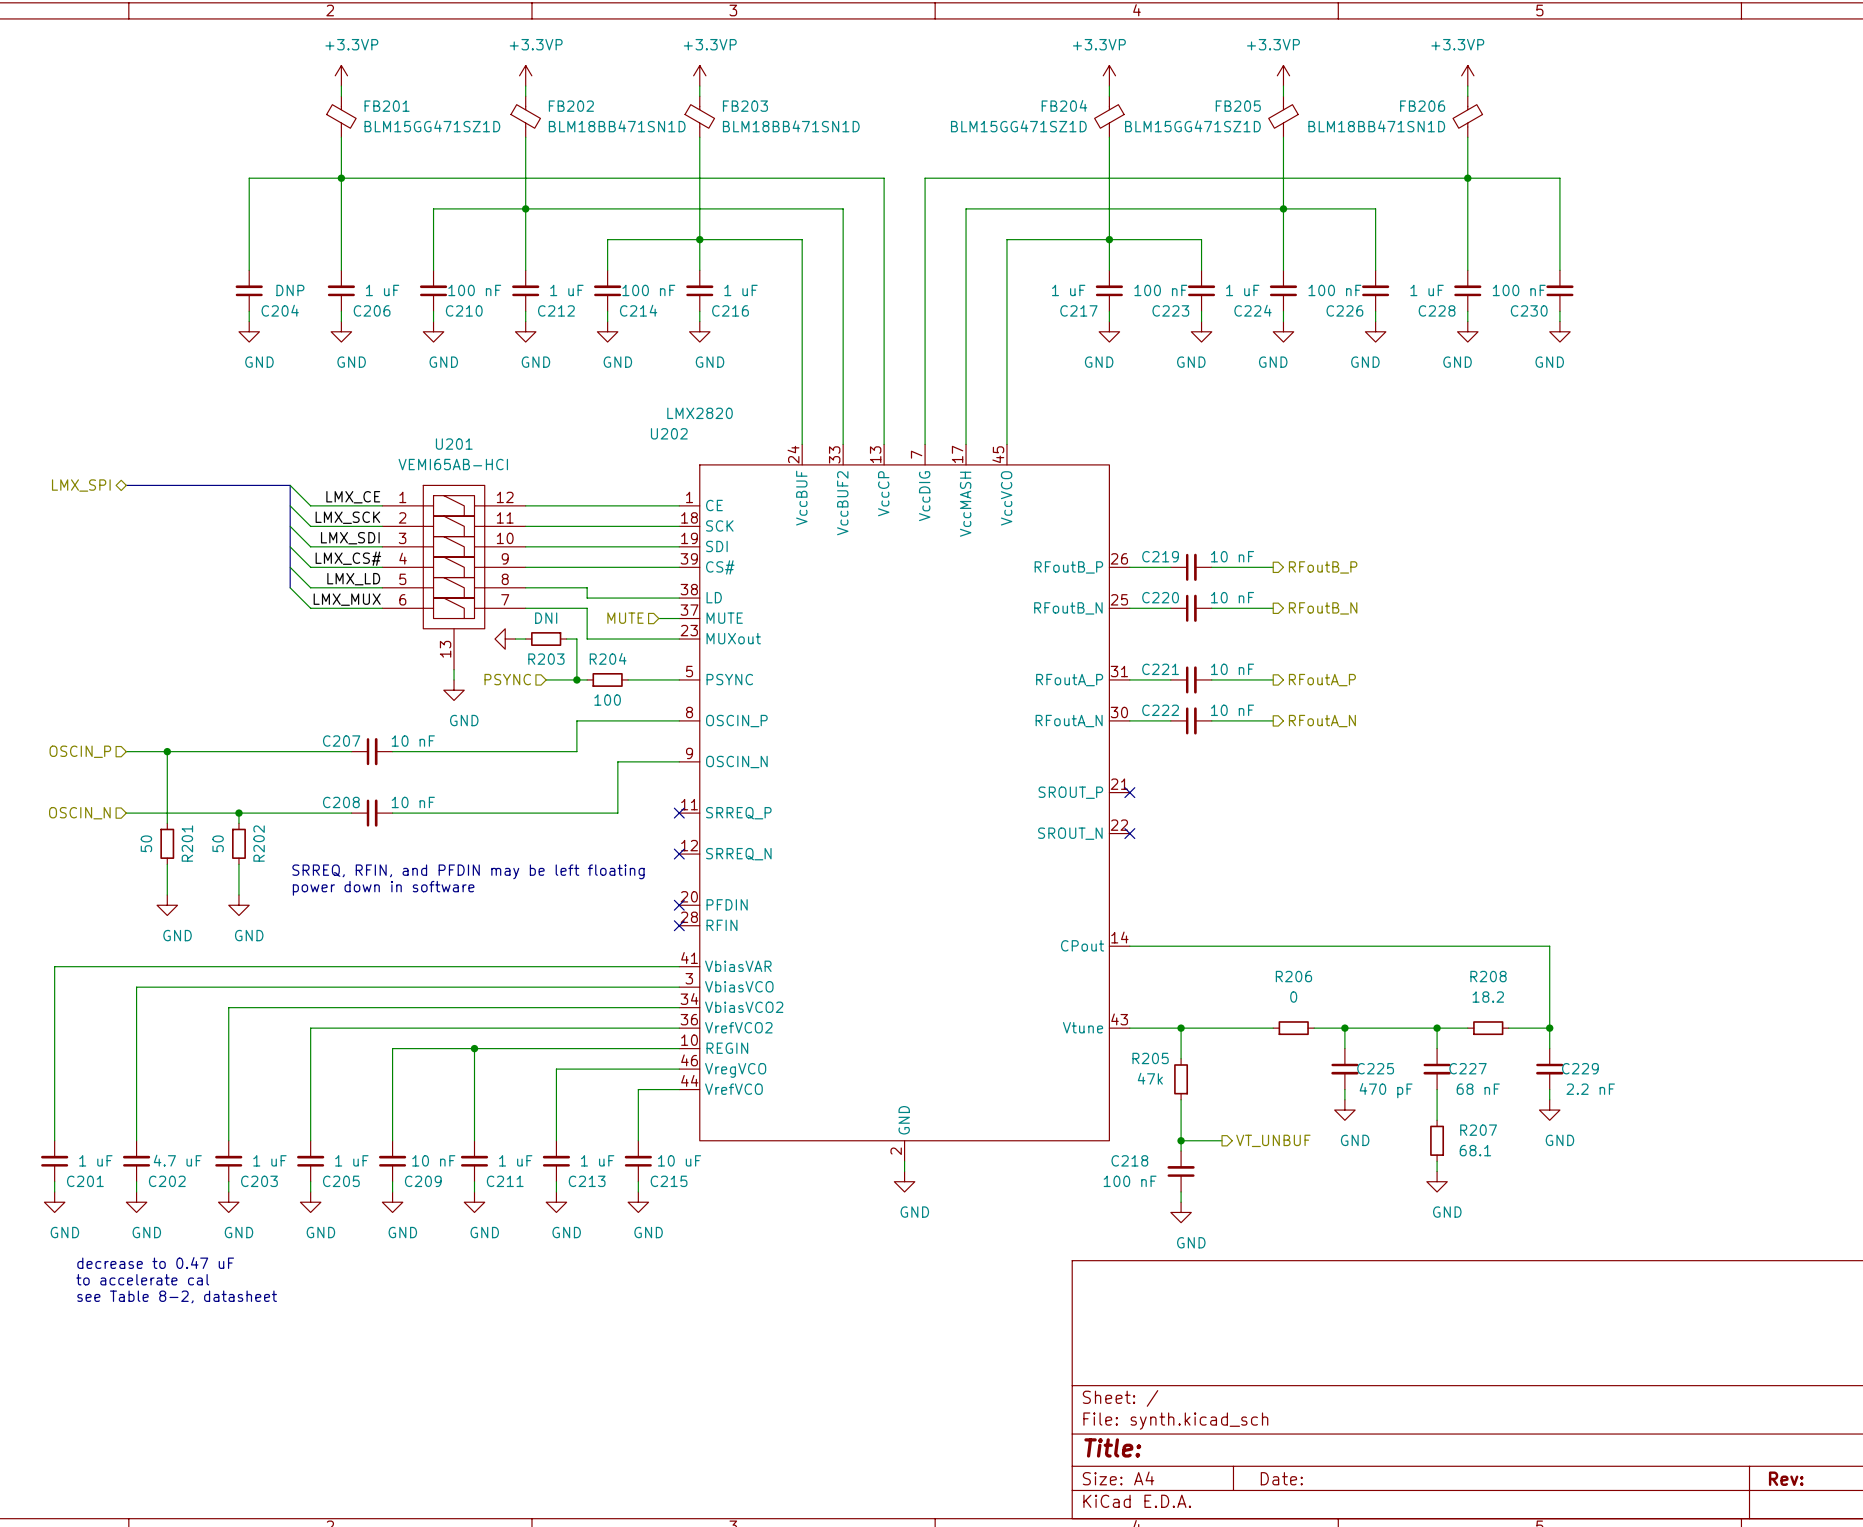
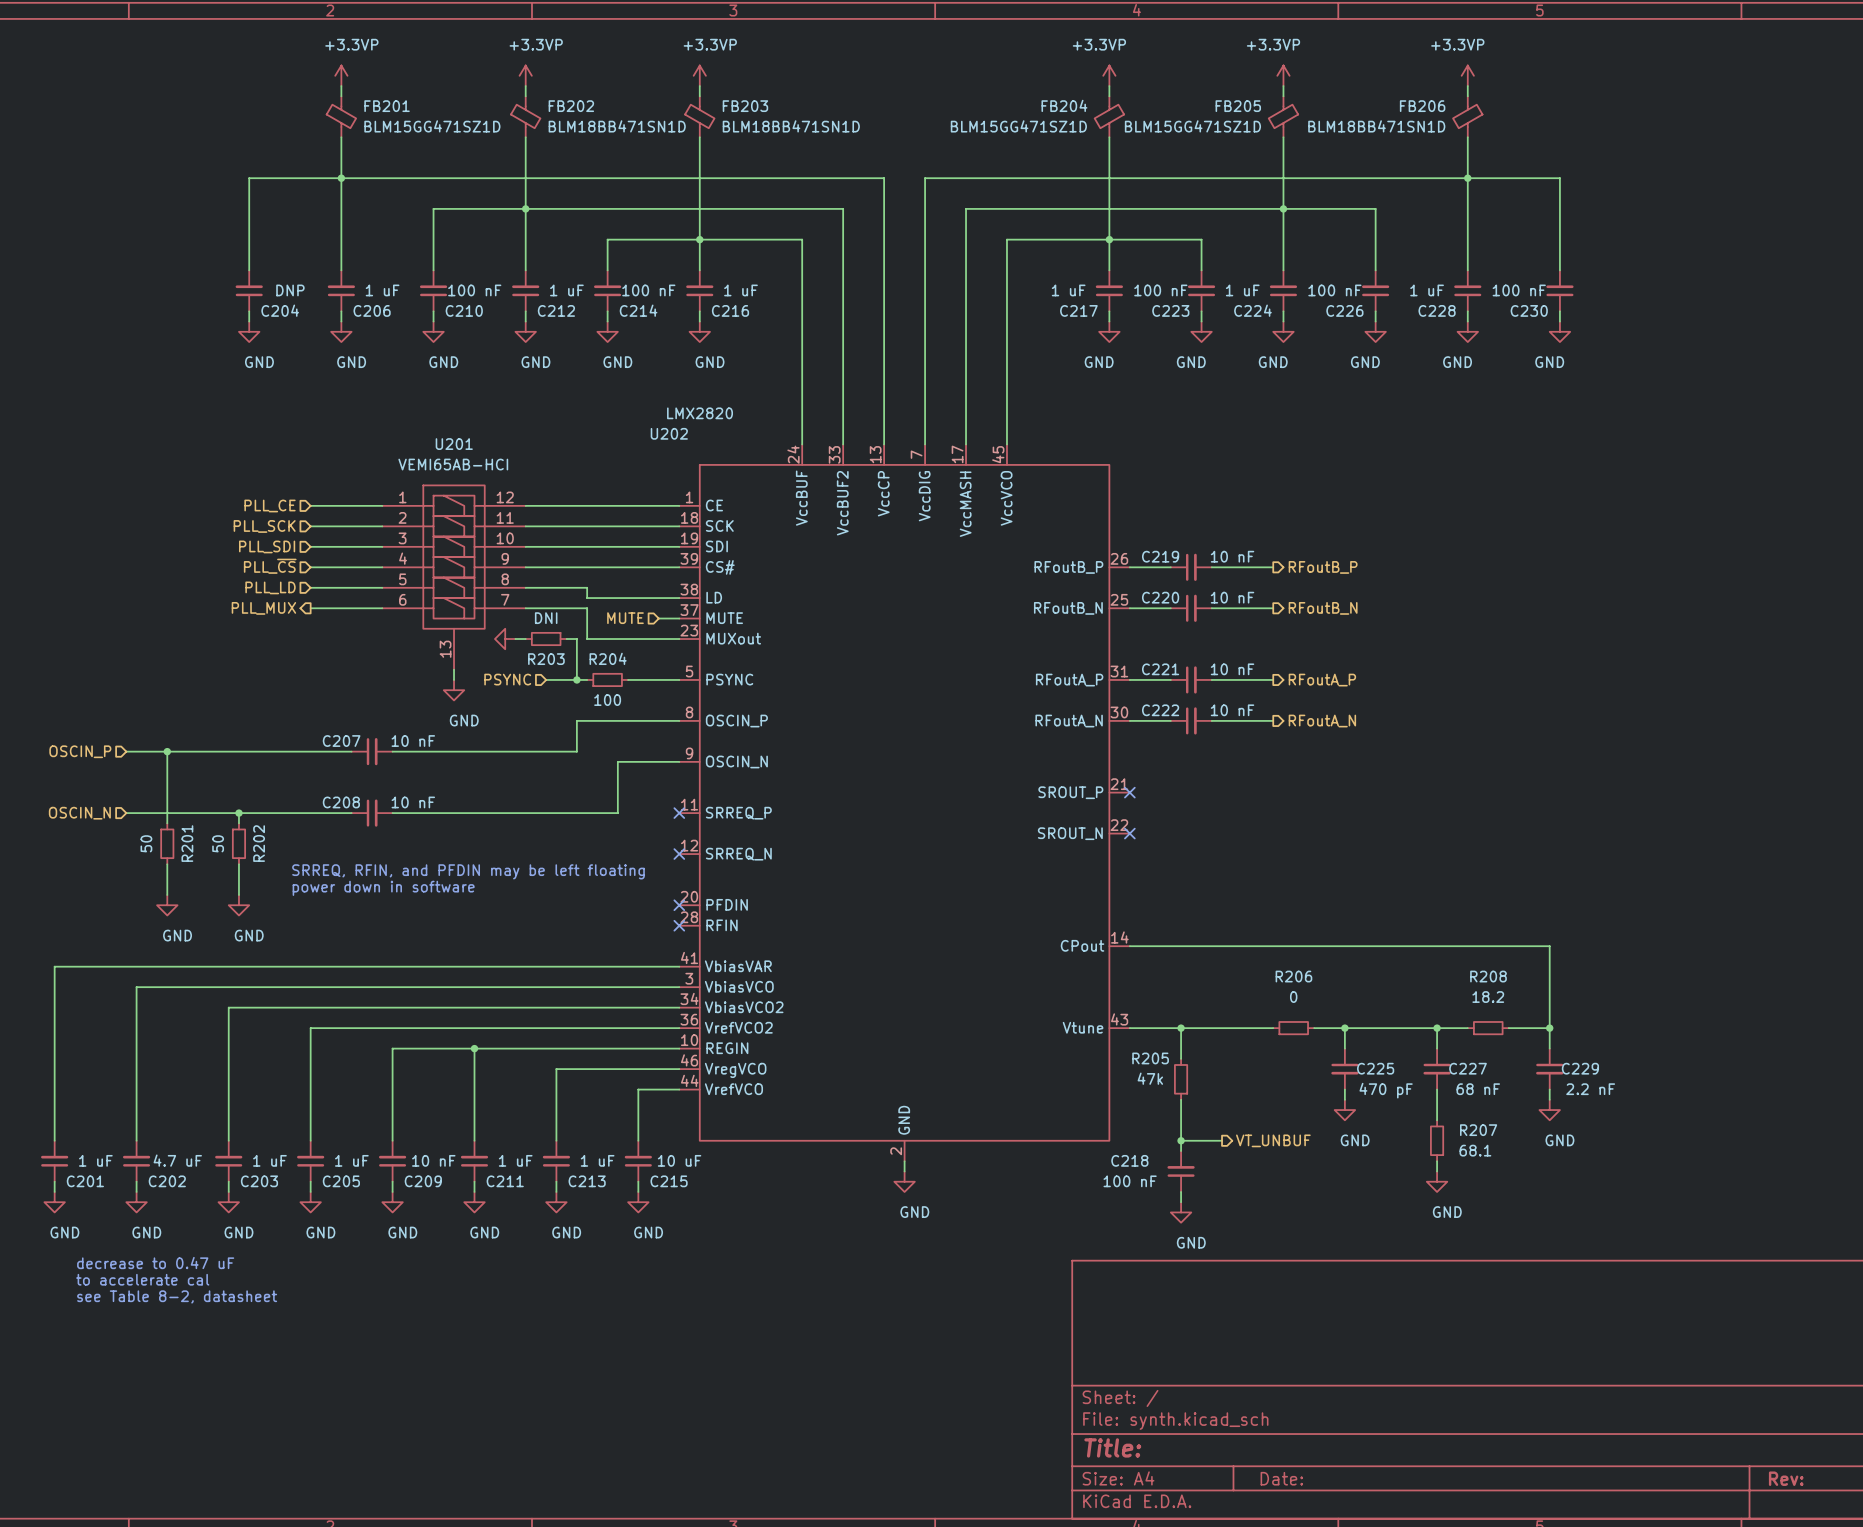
hierarchical label: LMX_SPI (81, 485) -> none
bus: (126, 485) (290, 485) (290, 587) -> none
wire: (290, 485) (310, 505) -> none
label: LMX_CE (353, 497) -> none
hierarchical label: none -> PLL_CE (270, 505)
wire: (290, 505) (310, 526) -> none
label: LMX_SCK (347, 517) -> none
hierarchical label: none -> PLL_SCK (264, 526)
wire: (290, 526) (310, 546) -> none
label: LMX_SDI (350, 538) -> none
hierarchical label: none -> PLL_SDI (267, 546)
wire: (290, 546) (310, 567) -> none
label: LMX_CS# (348, 558) -> none
hierarchical label: none -> PLL_~{CS} (270, 566)
wire: (290, 567) (310, 587) -> none
label: LMX_LD (353, 579) -> none
hierarchical label: none -> PLL_LD (270, 587)
wire: (290, 587) (310, 608) -> none
label: LMX_MUX (347, 599) -> none
hierarchical label: none -> PLL_MUX (263, 608)

